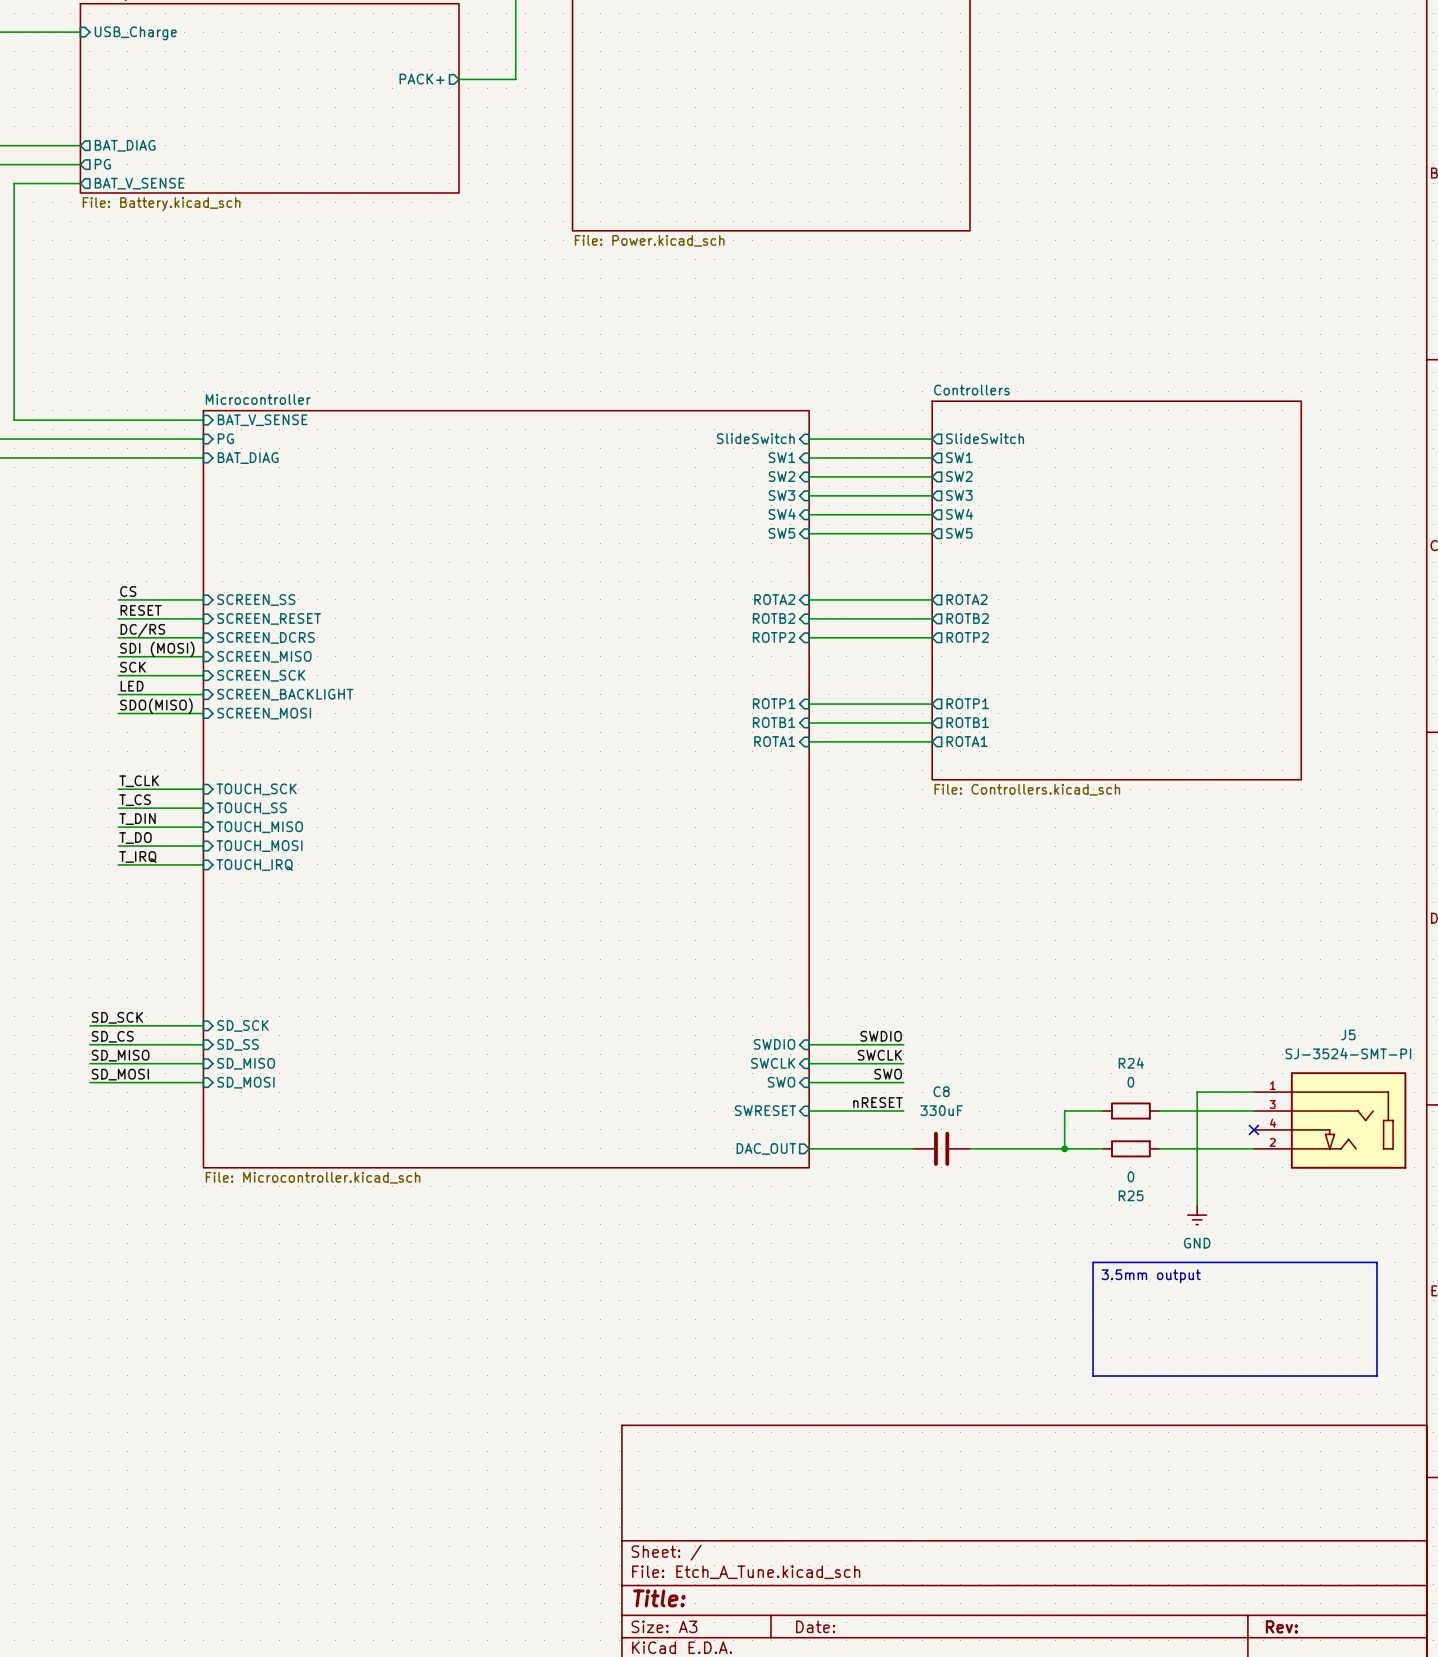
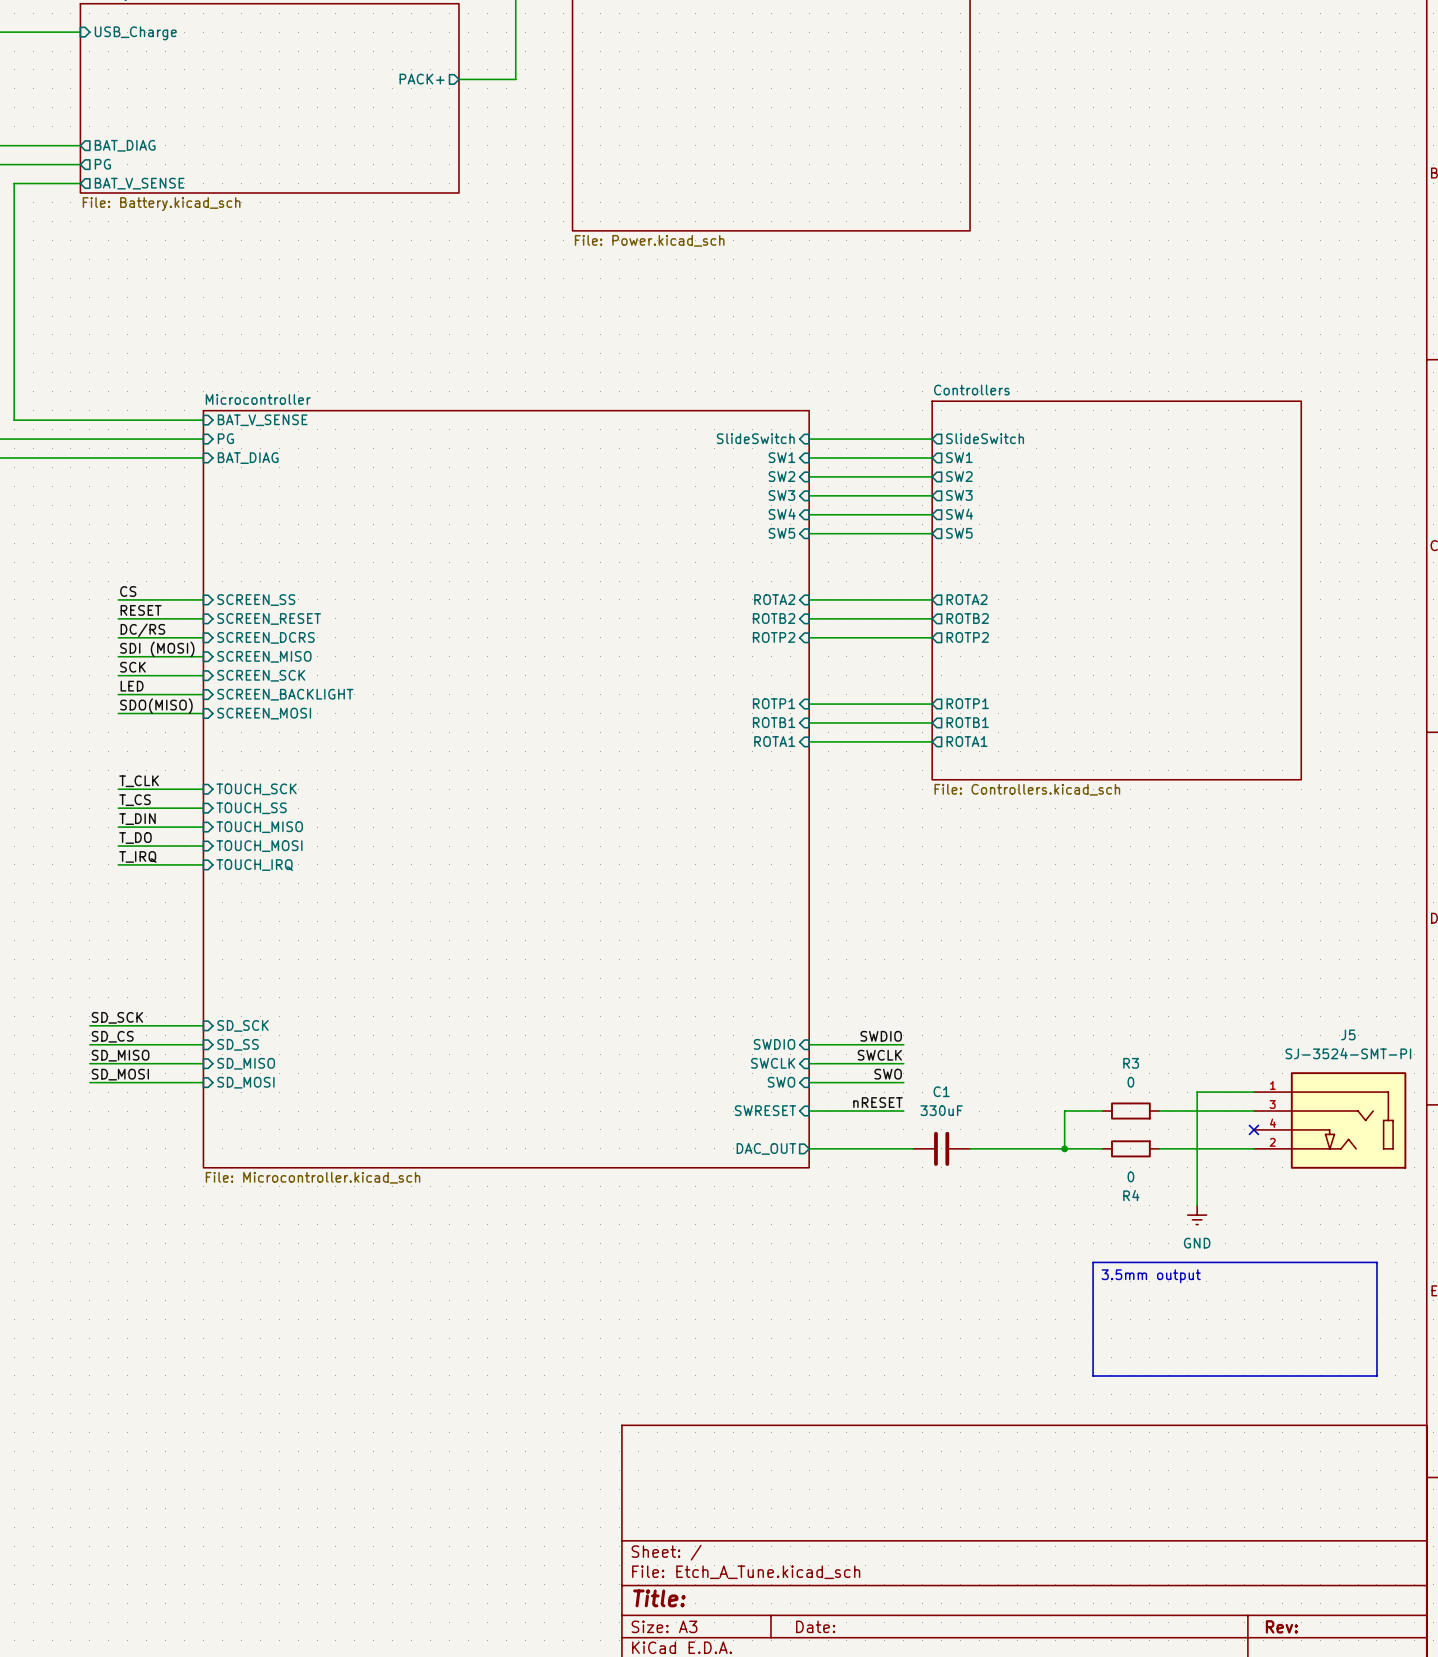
R24 name: R24 (1131, 1063) -> R3 (1131, 1063)
C8 name: C8 (941, 1091) -> C1 (941, 1091)
R25 name: R25 (1131, 1195) -> R4 (1131, 1195)

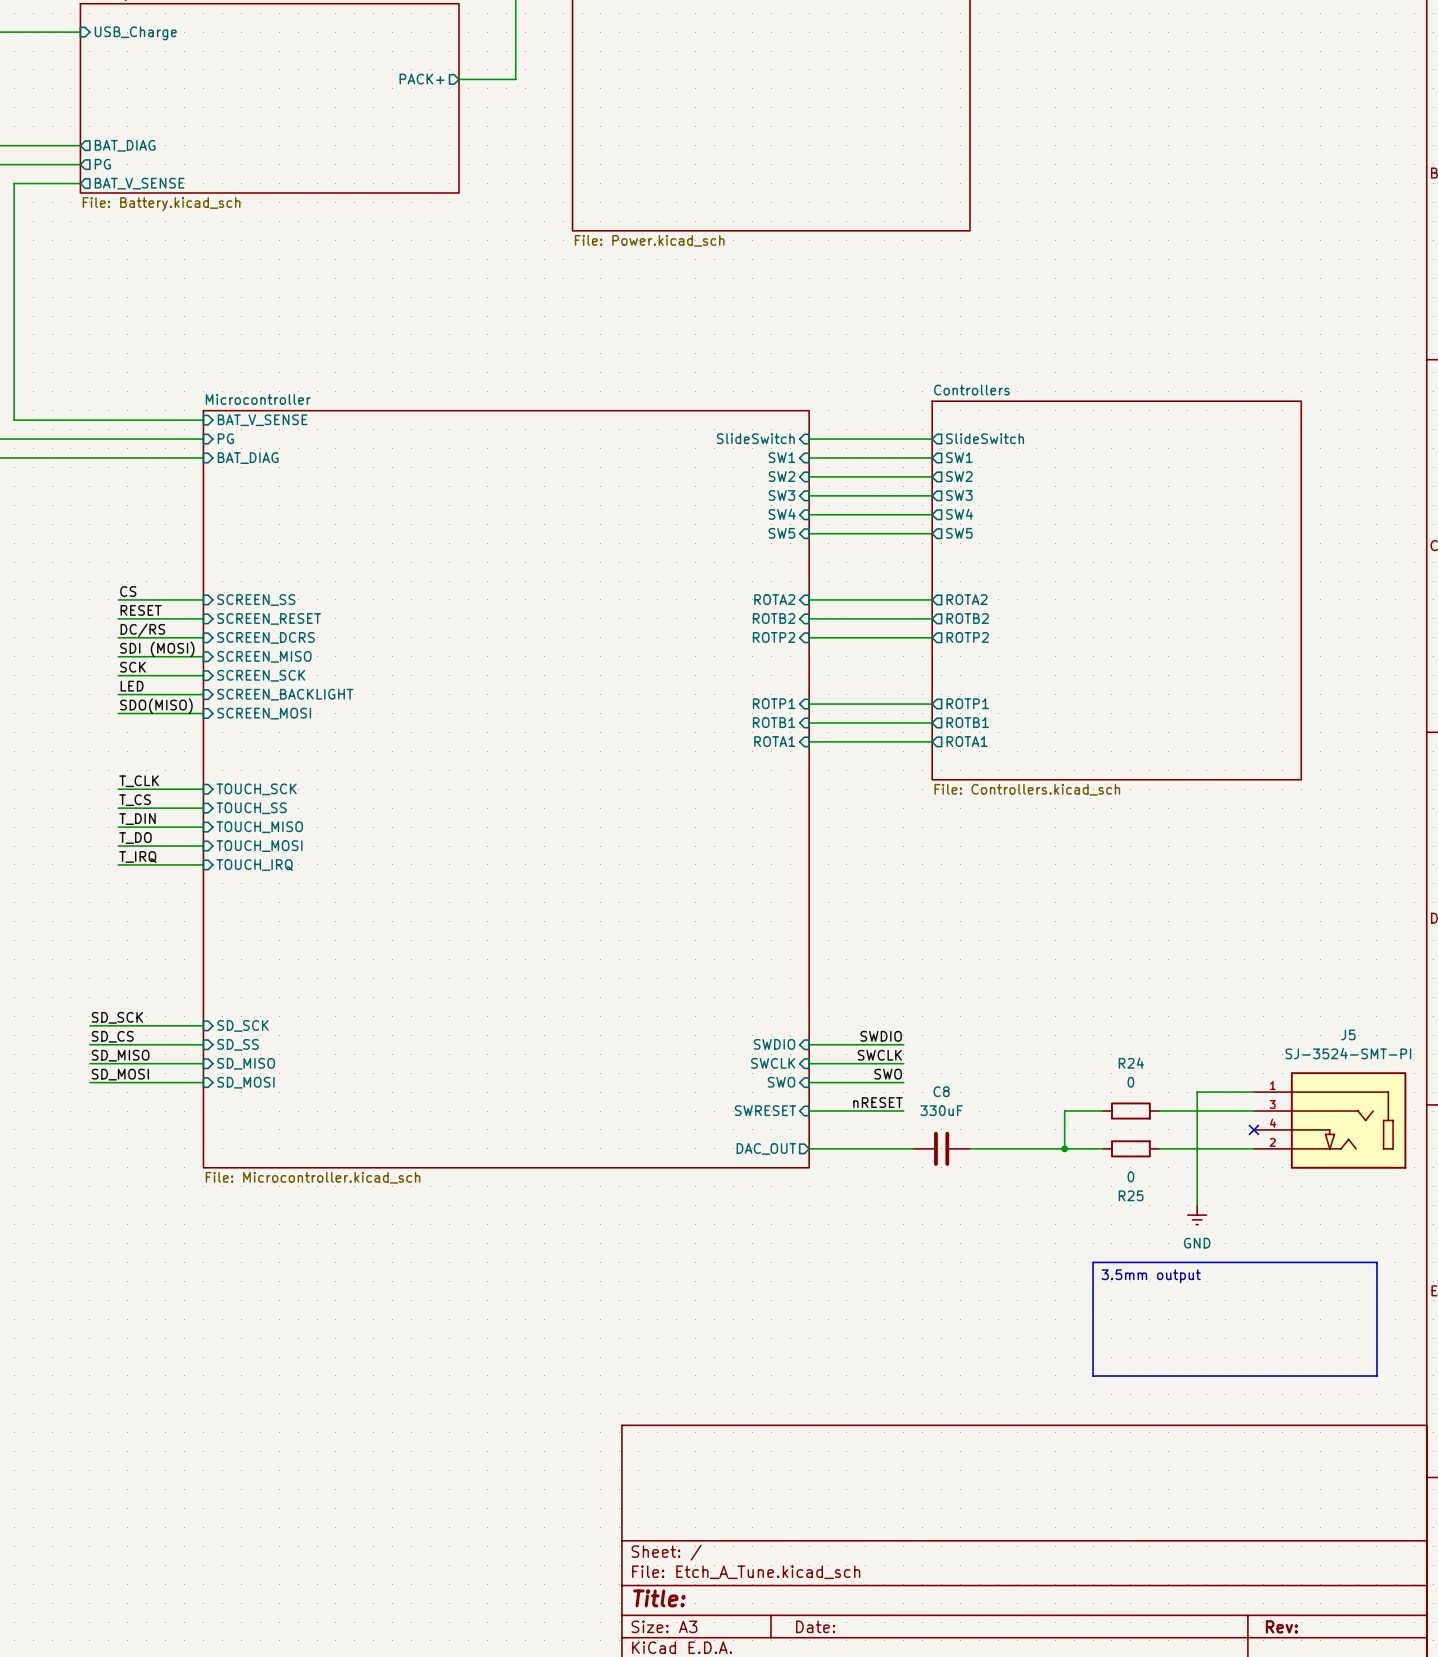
R3 name: R3 (1131, 1063) -> R24 (1131, 1063)
C1 name: C1 (941, 1091) -> C8 (941, 1091)
R4 name: R4 (1131, 1195) -> R25 (1131, 1195)

